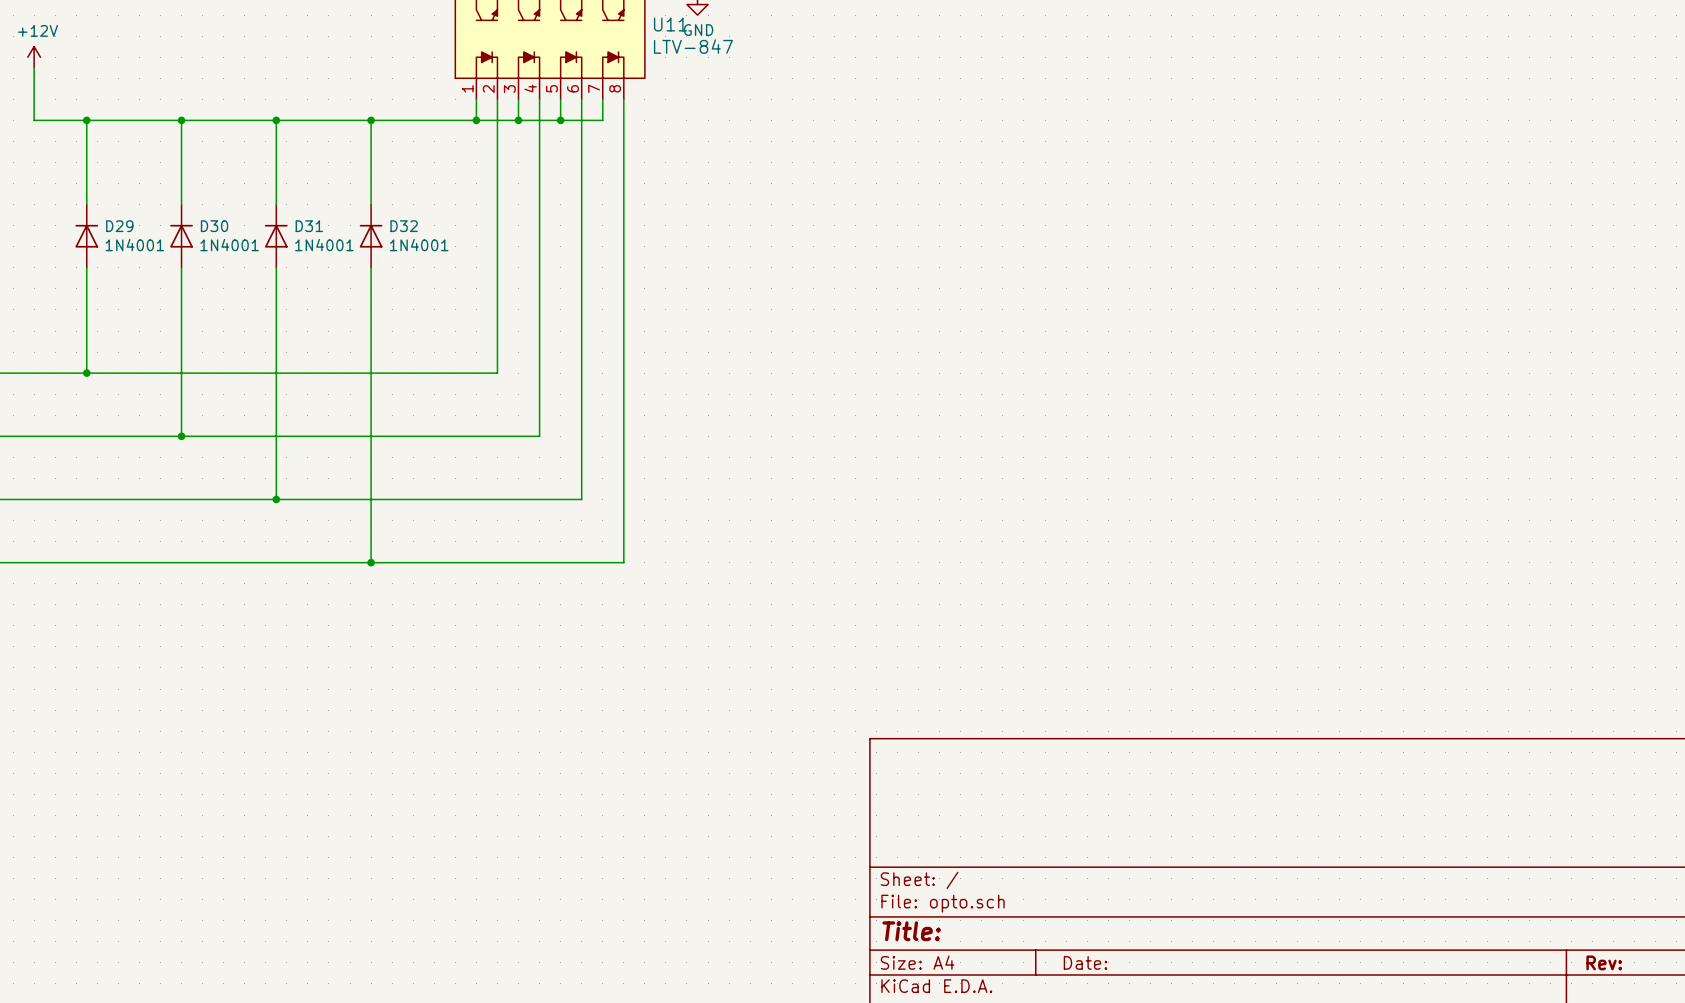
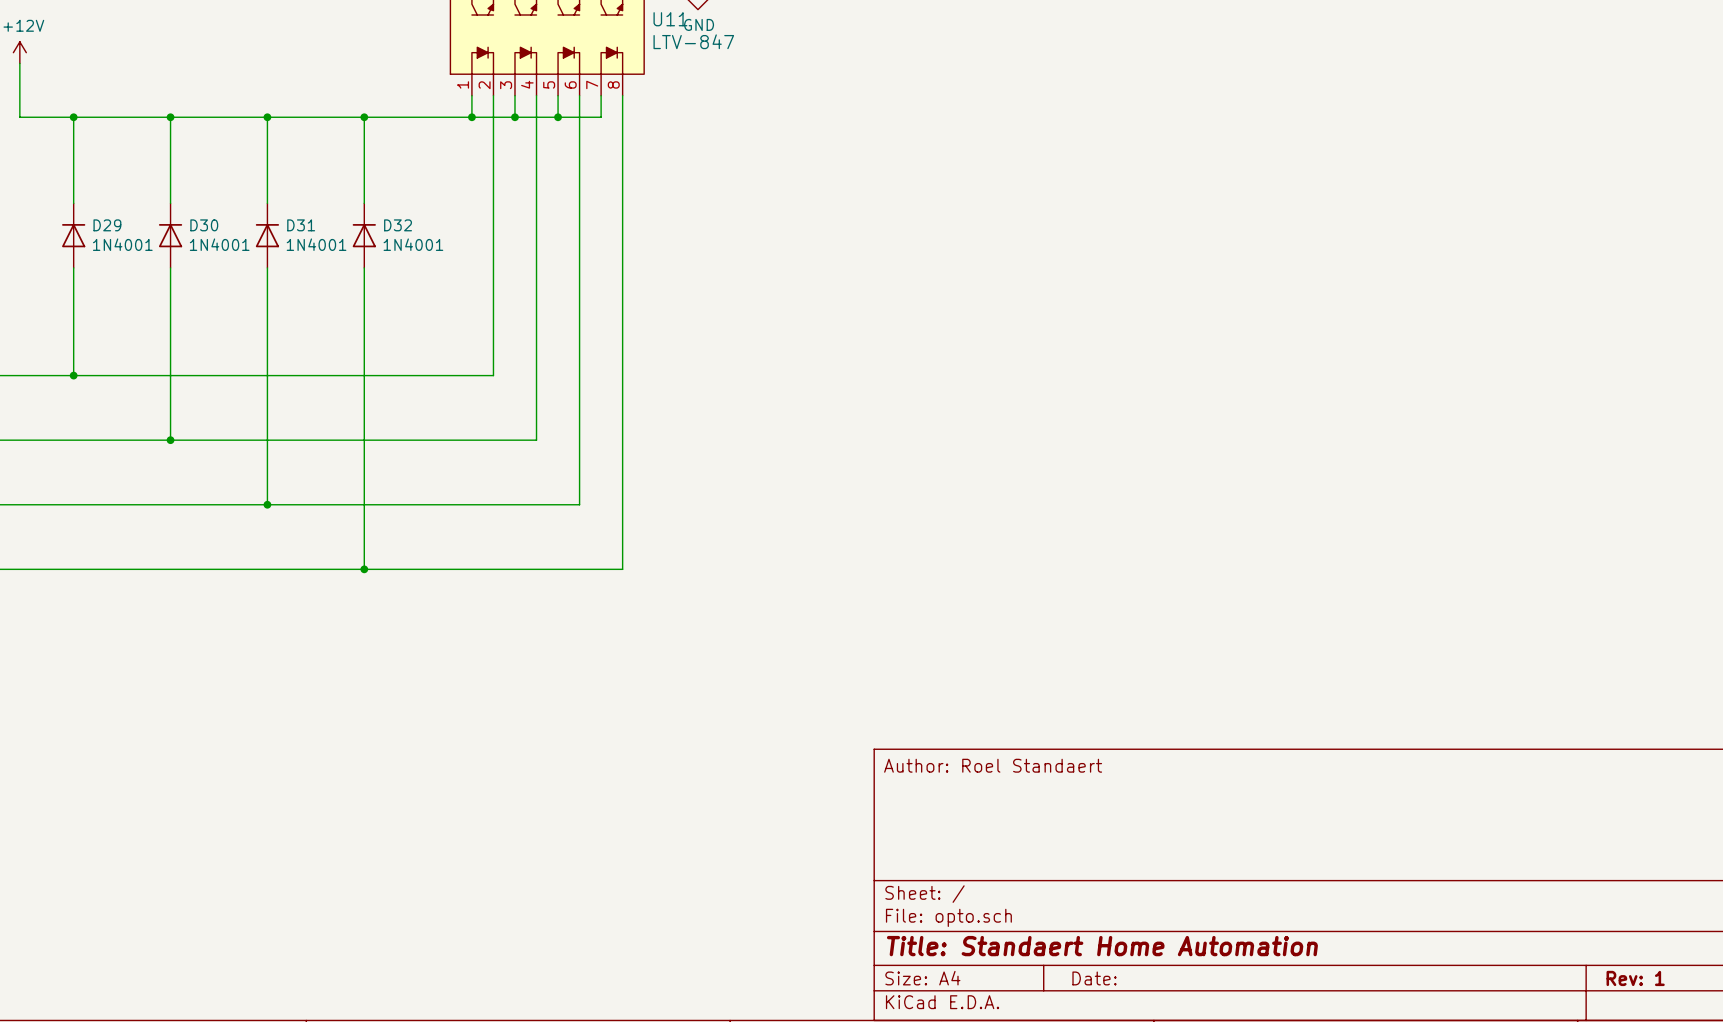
title block: none -> Author: Roel Standaert (993, 765)
title block: Title: (911, 931) -> Title: Standaert Home Automation (1102, 946)
title block: Rev: (1604, 962) -> Rev: 1 (1635, 978)

